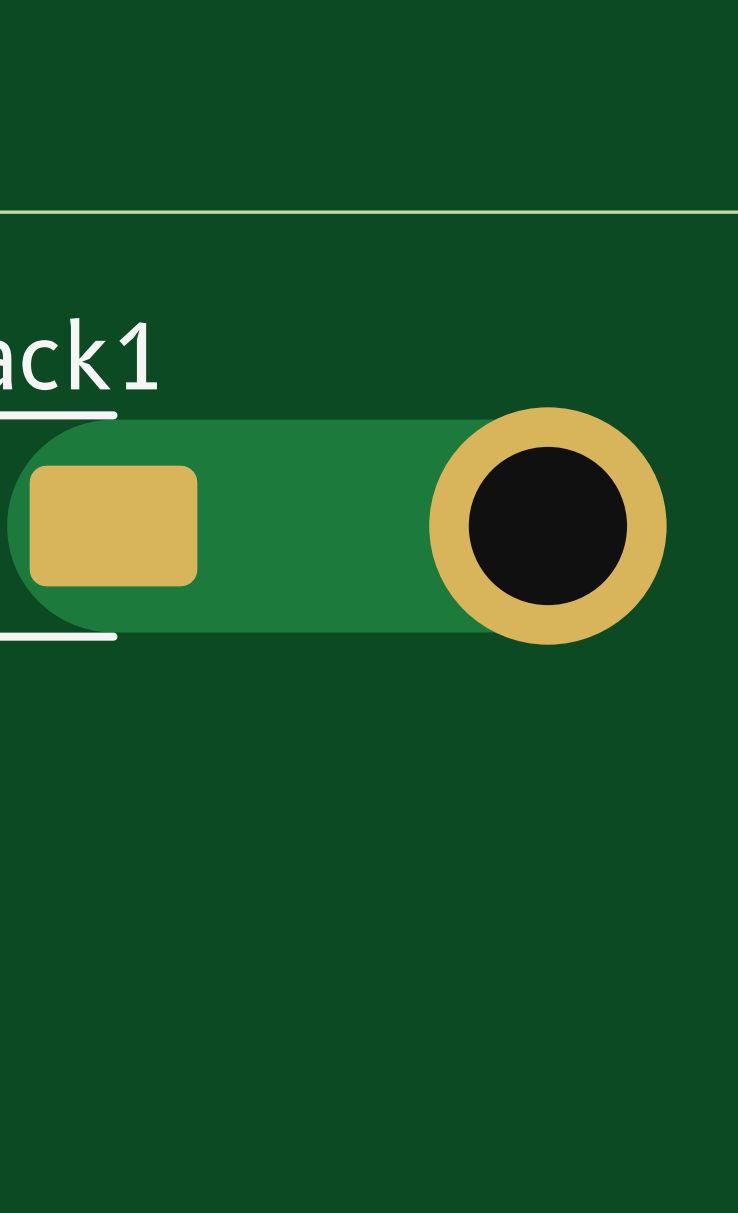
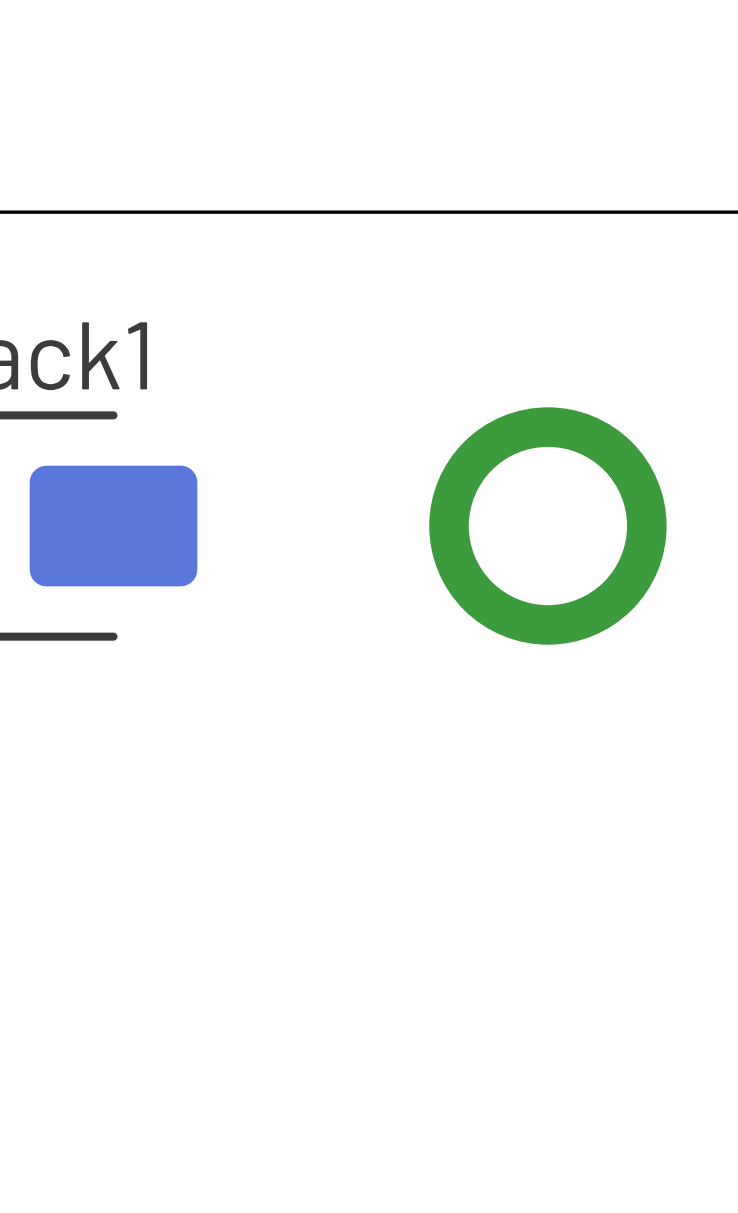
track: (547, 526) (113, 526) -> none

